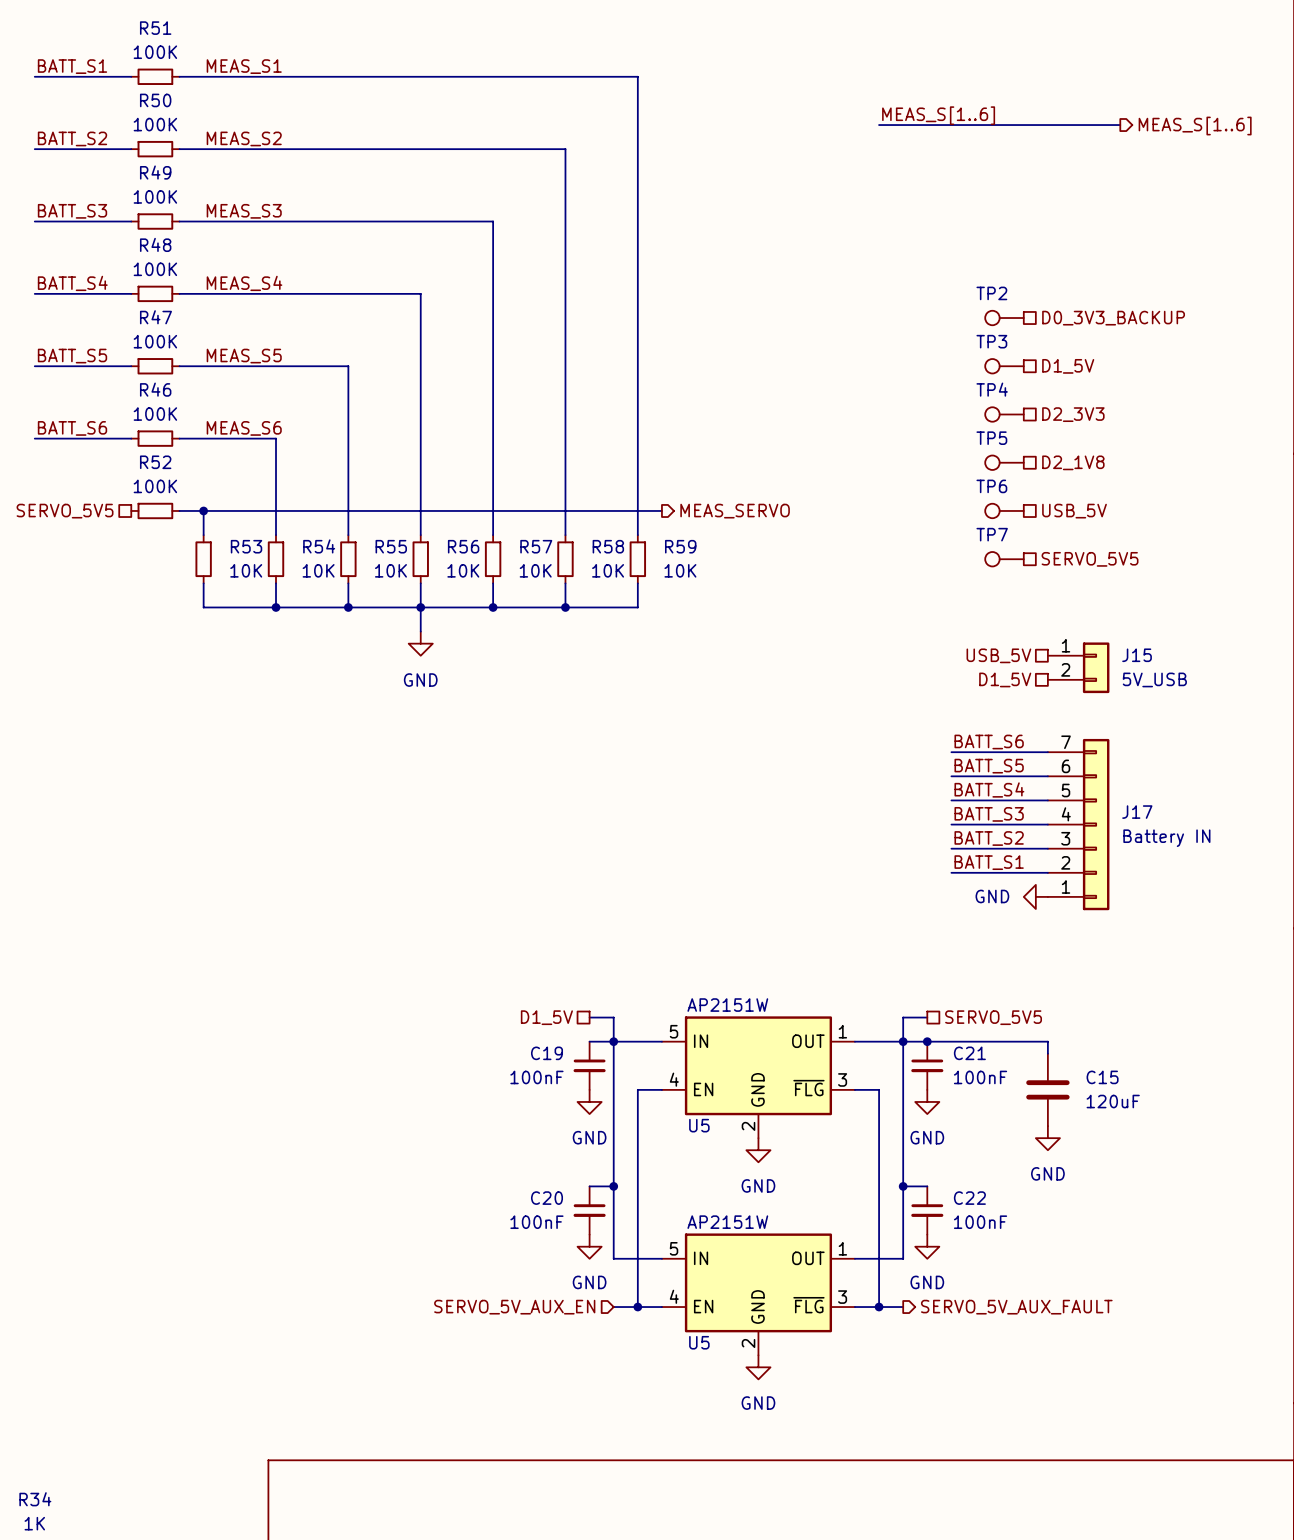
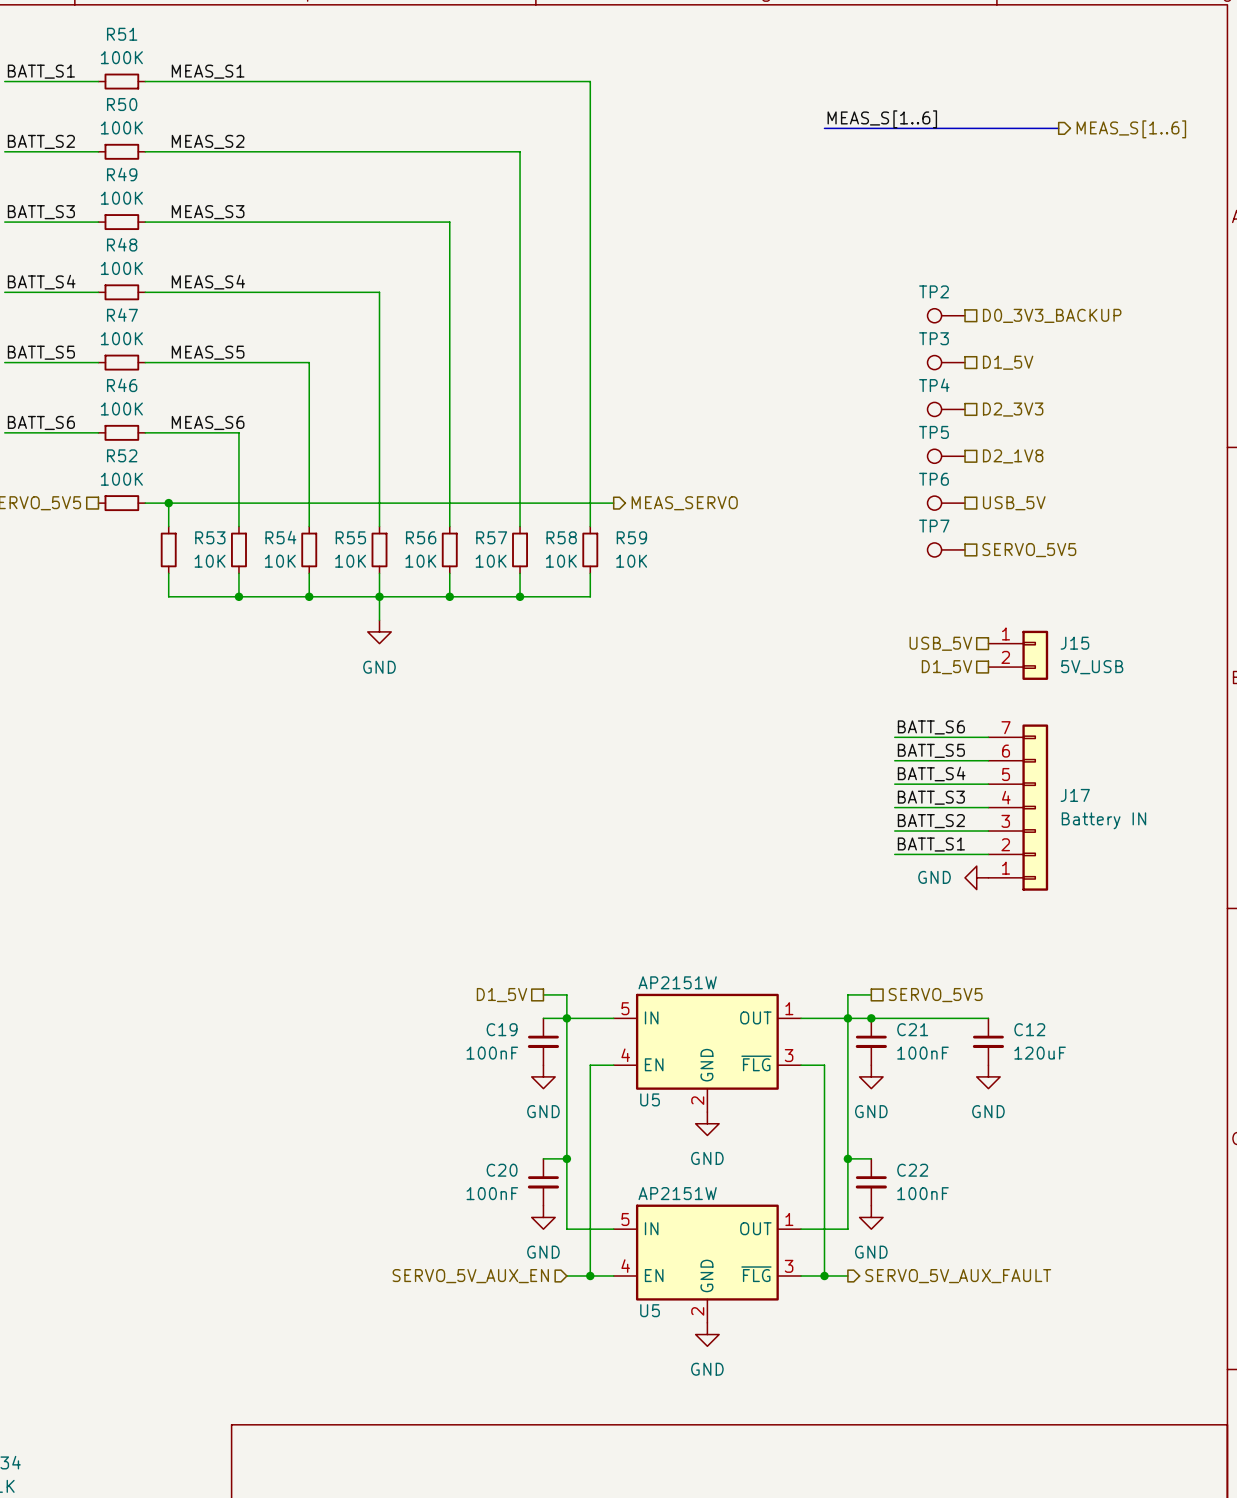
C12: none -> 120uF (988, 1041)
C15: 120uF (1047, 1089) -> none
power symbol position: GND (1047, 1138) -> GND (988, 1076)

